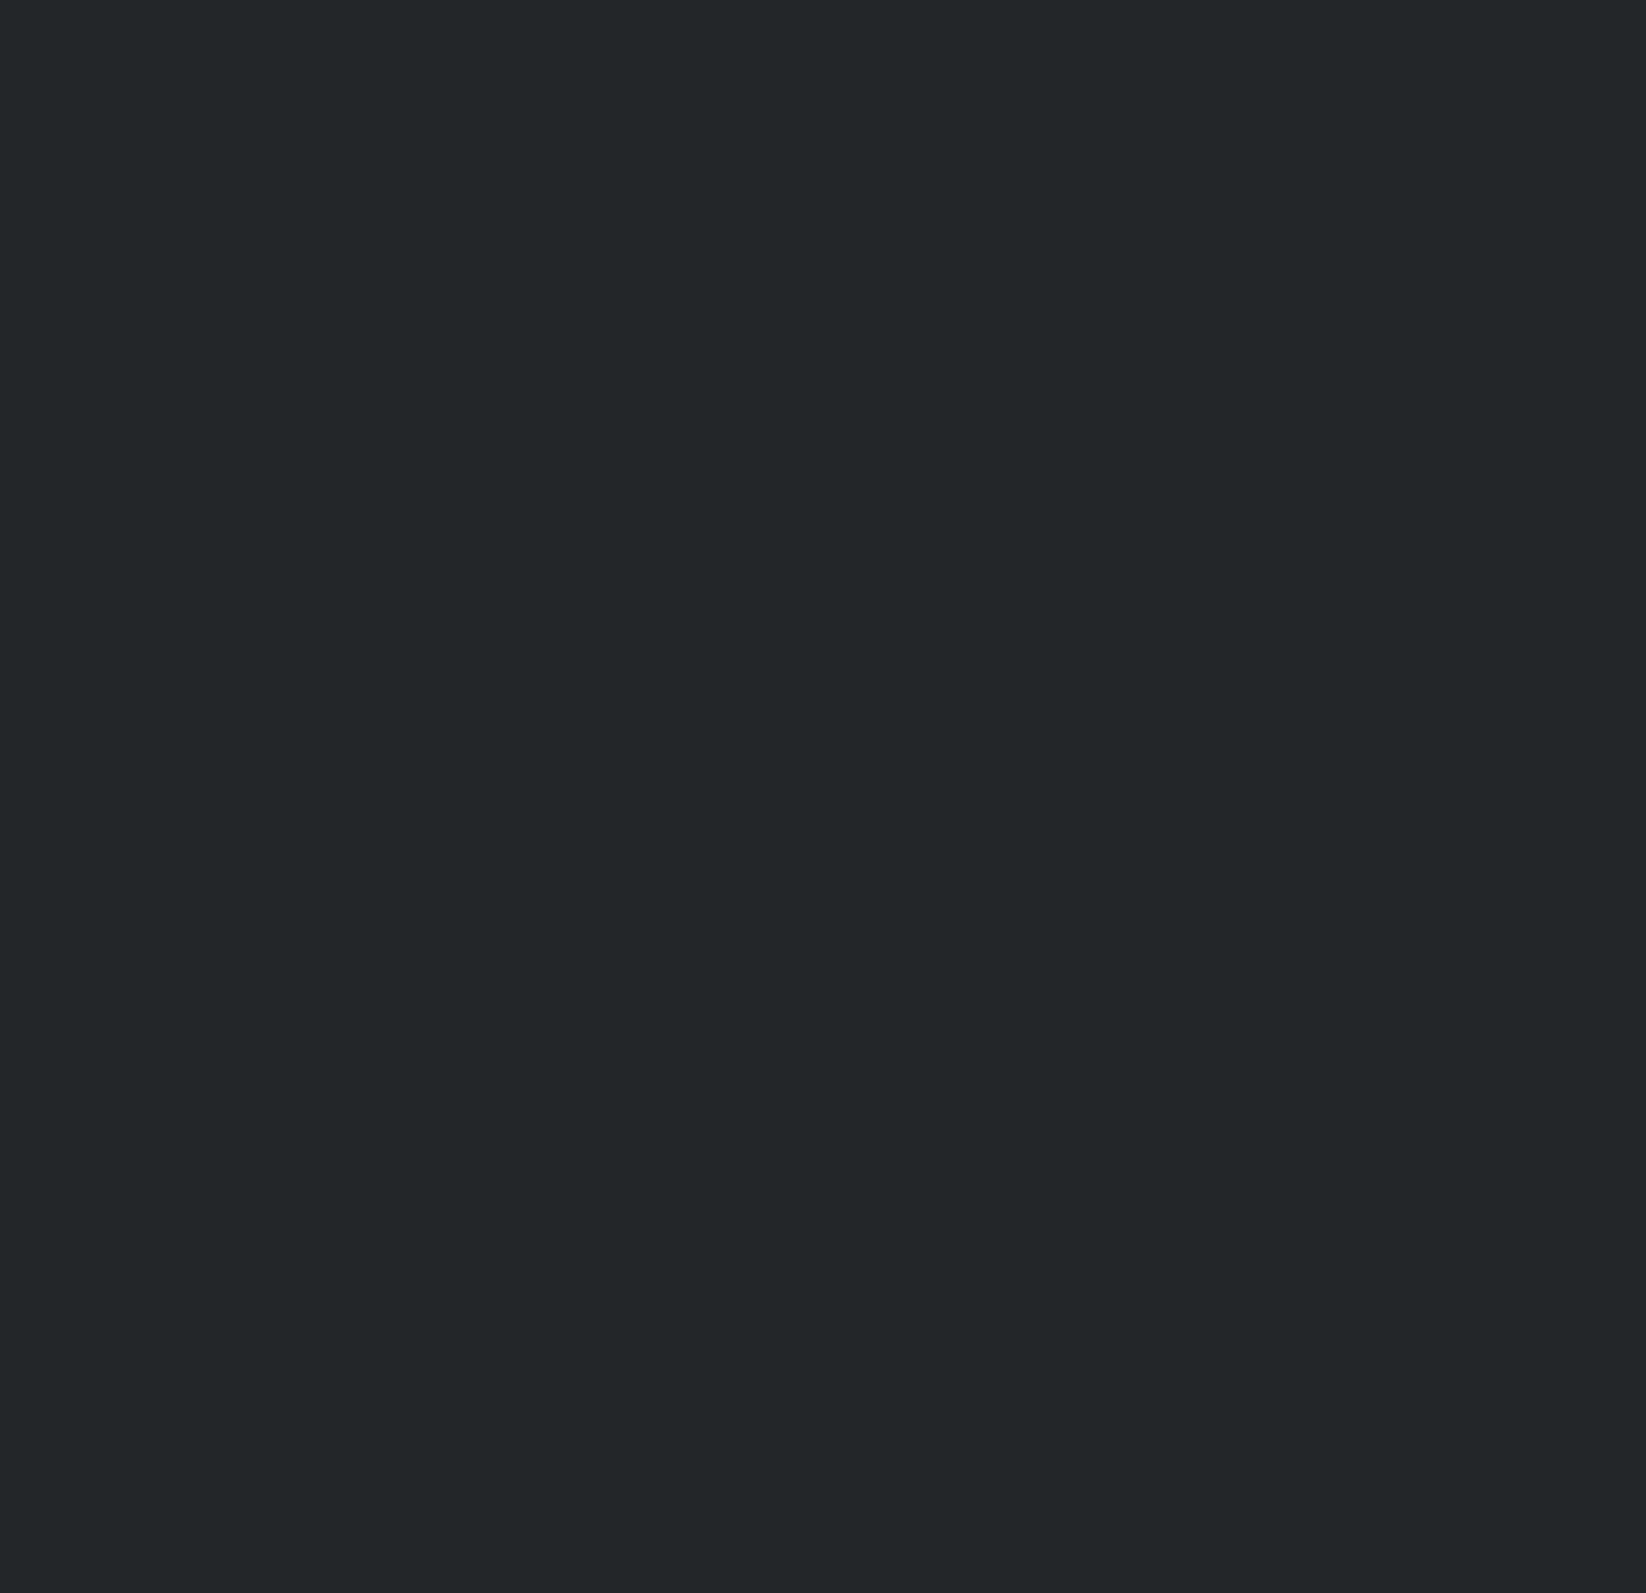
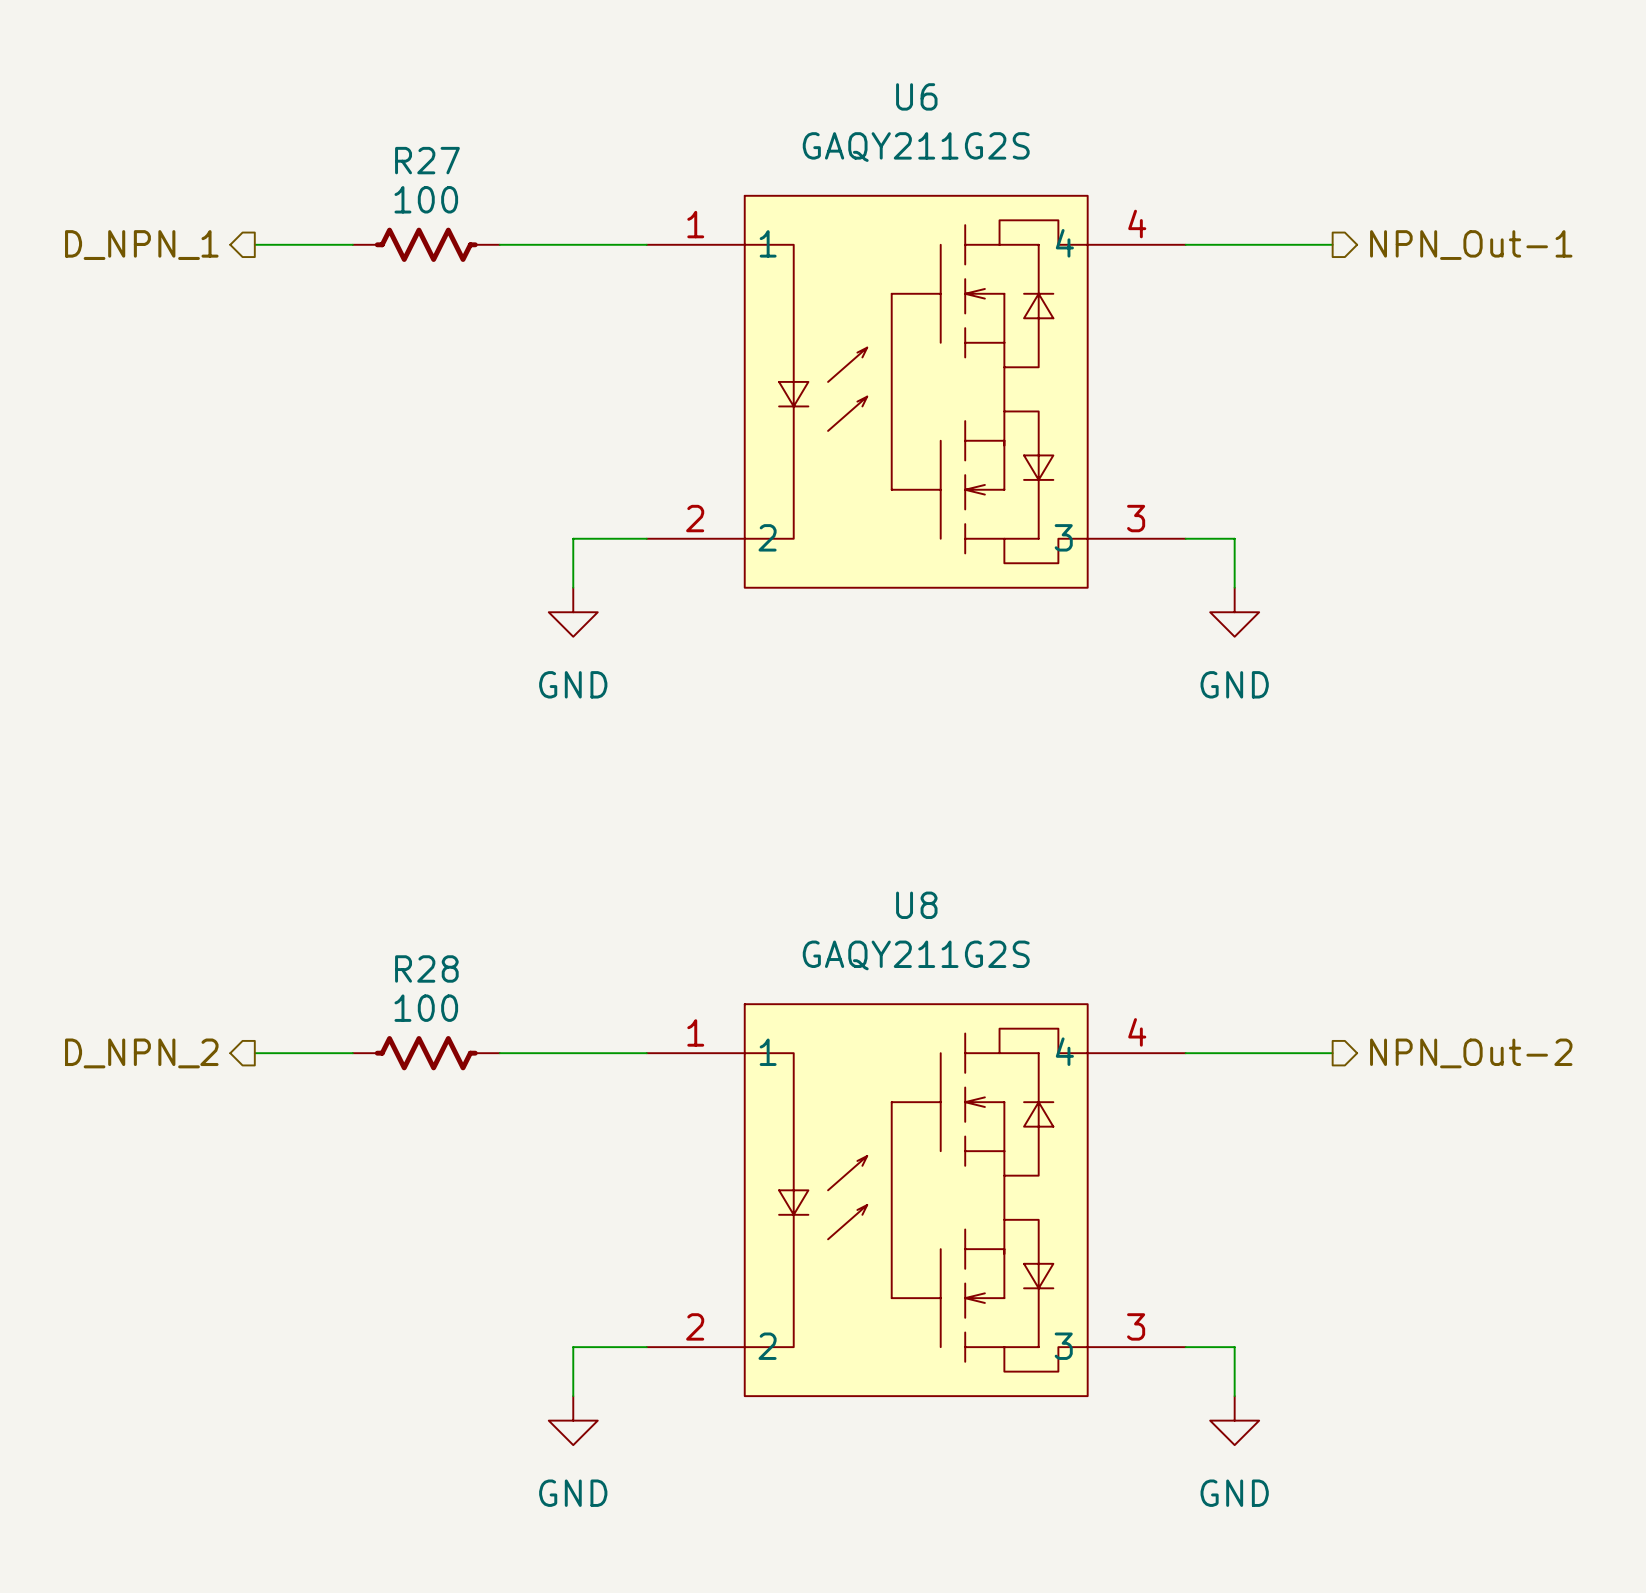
wire: none -> (254, 244) (352, 244)
R27: none -> (426, 244)
wire: none -> (499, 244) (646, 244)
wire: none -> (1185, 244) (1332, 244)
hierarchical label: none -> D_NPN_1 (141, 245)
hierarchical label: none -> NPN_Out-1 (1471, 245)
U6: none -> GAQY211G2S (916, 391)
wire: none -> (646, 538) (573, 538) (573, 587)
wire: none -> (1185, 538) (1234, 538) (1234, 587)
power symbol: none -> GND (573, 612)
power symbol: none -> GND (1234, 612)
hierarchical label: none -> D_NPN_2 (141, 1053)
wire: none -> (254, 1053) (352, 1053)
R28: none -> (426, 1053)
wire: none -> (499, 1053) (646, 1053)
wire: none -> (1185, 1053) (1332, 1053)
hierarchical label: none -> NPN_Out-2 (1471, 1053)
U8: none -> GAQY211G2S (916, 1200)
wire: none -> (646, 1347) (573, 1347) (573, 1396)
wire: none -> (1185, 1347) (1234, 1347) (1234, 1396)
power symbol: none -> GND (573, 1420)
power symbol: none -> GND (1234, 1420)

